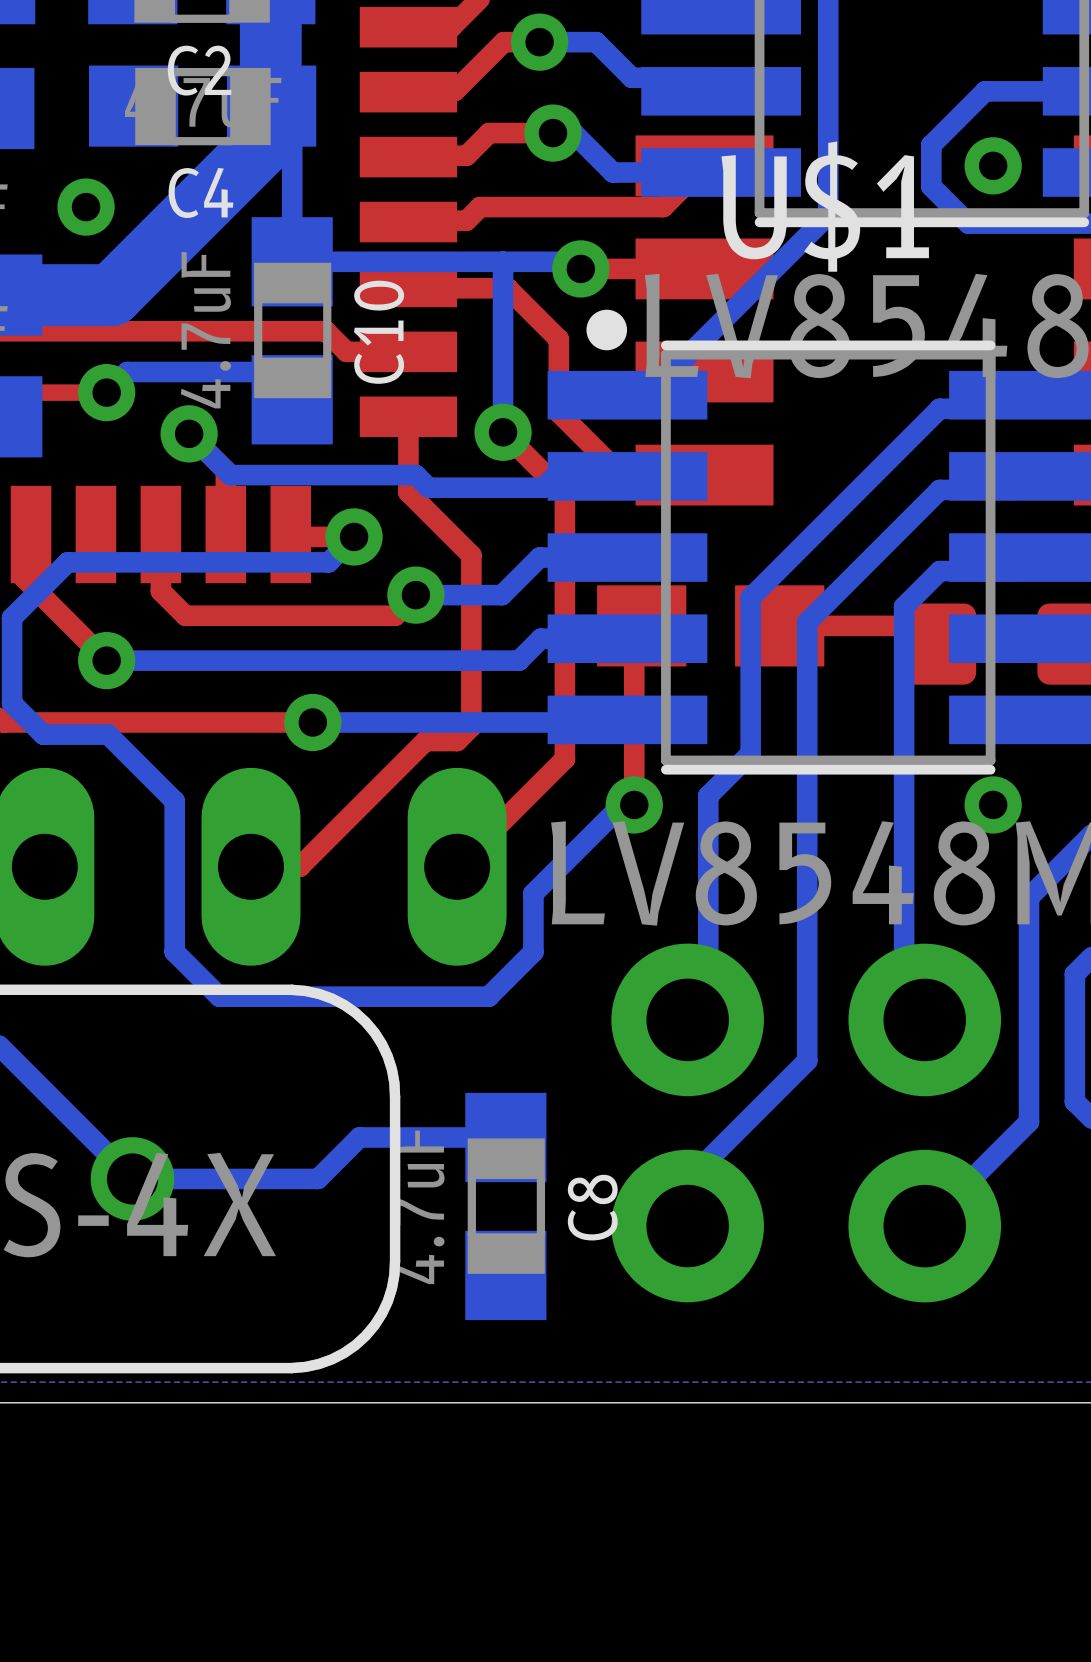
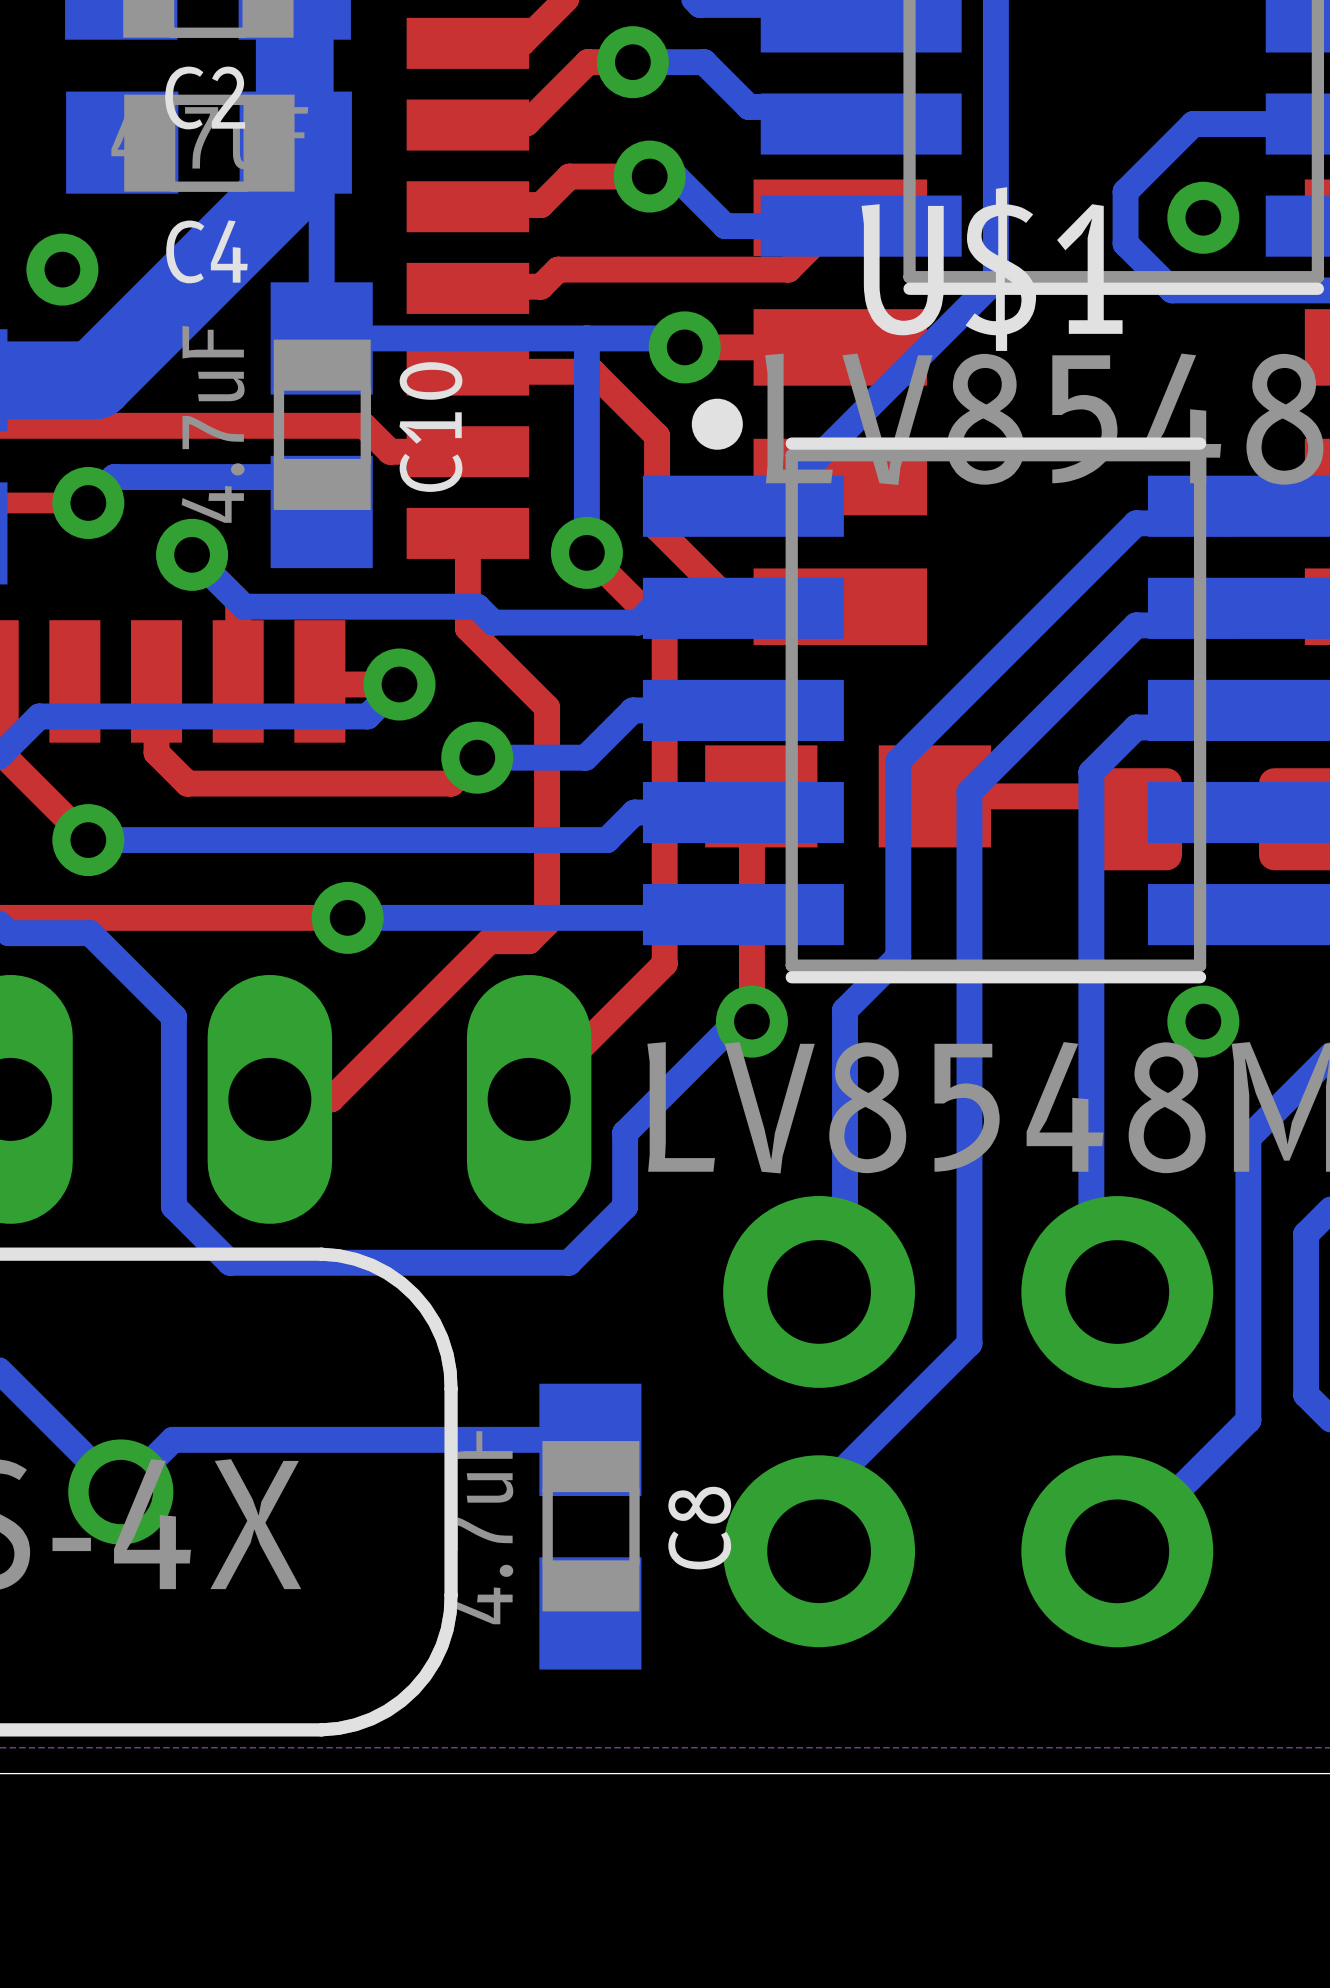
bottom track: (359, 1137) (318, 1178) (132, 1178) -> (406, 1439) (172, 1439) (120, 1492)

